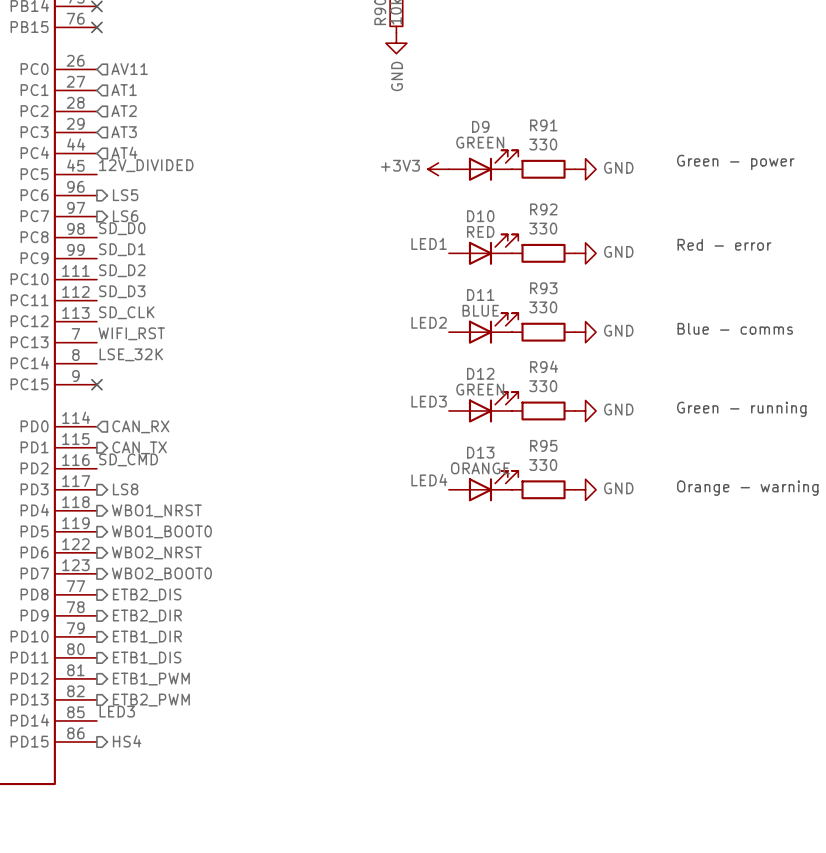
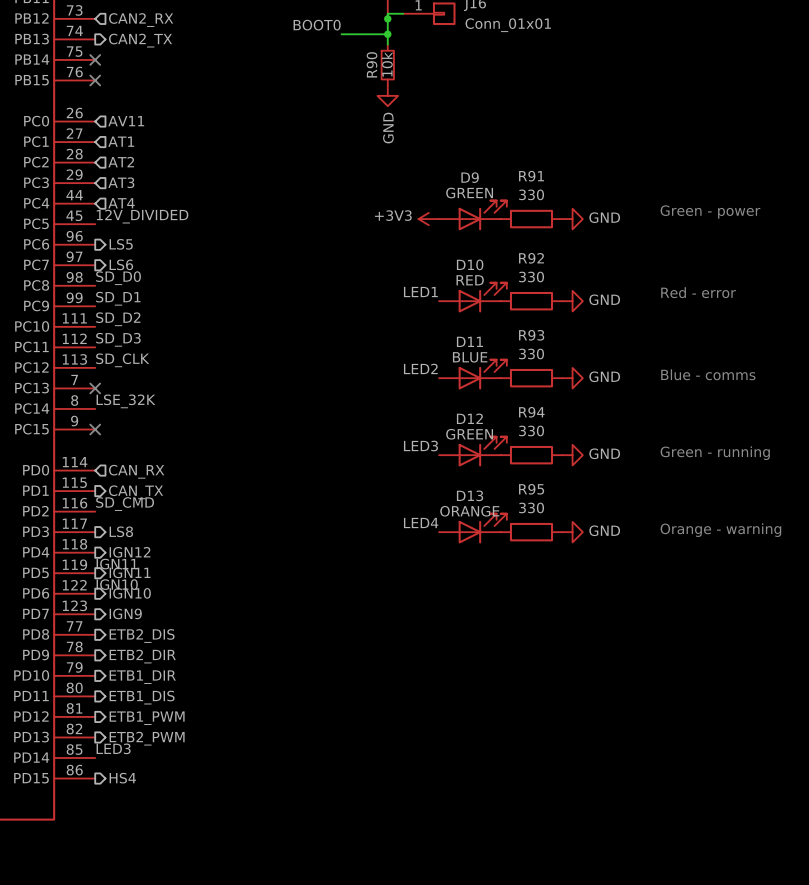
label: WIFI_RST (131, 333) -> none
no-connect mark: none -> (95, 388)
hierarchical label: WBO1_NRST (156, 510) -> IGN12 (129, 552)
label: none -> IGN11 (117, 564)
hierarchical label: WBO1_BOOT0 (161, 531) -> IGN11 (130, 572)
label: none -> IGN10 (117, 584)
hierarchical label: WBO2_NRST (156, 552) -> IGN10 (130, 593)
hierarchical label: WBO2_BOOT0 (161, 573) -> IGN9 (125, 613)

